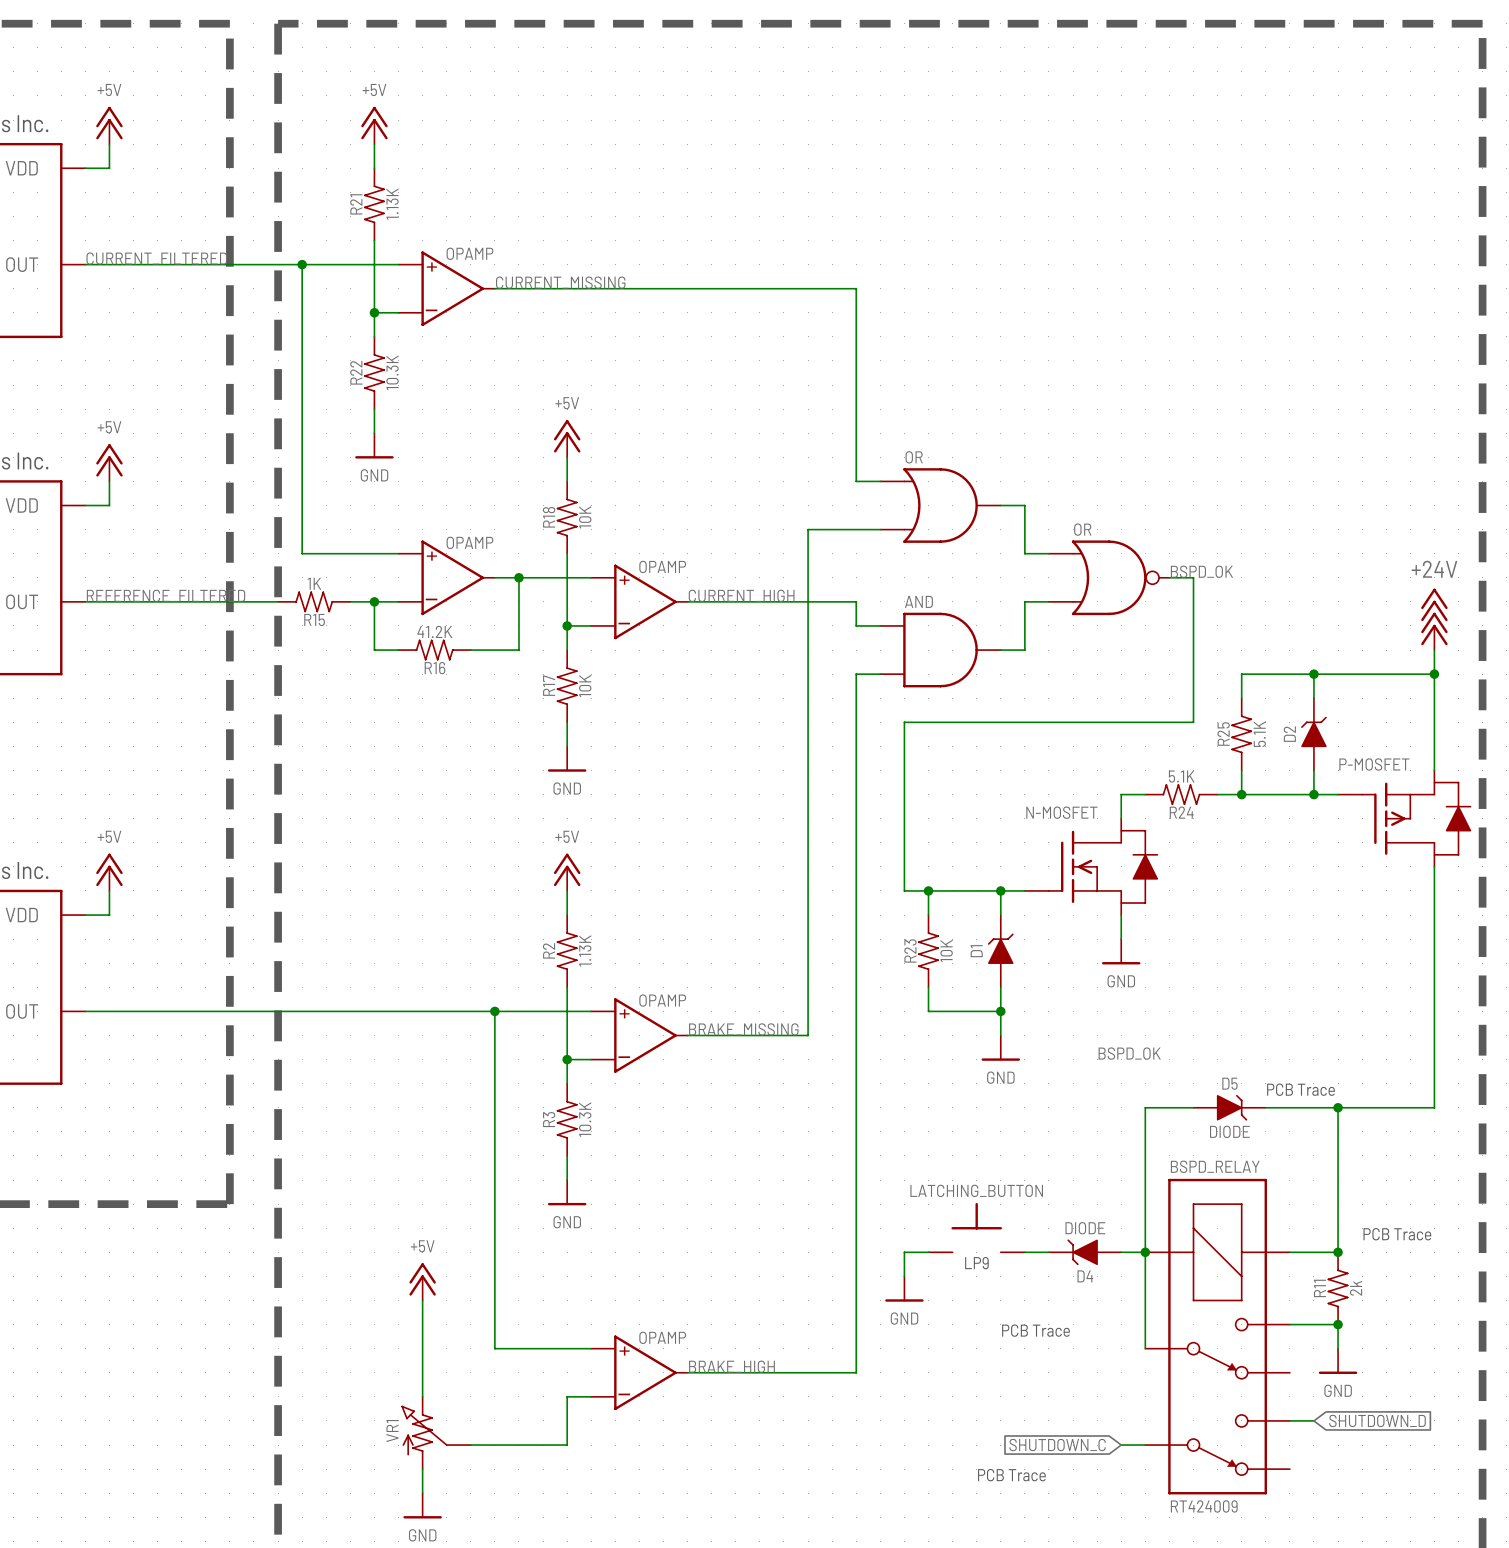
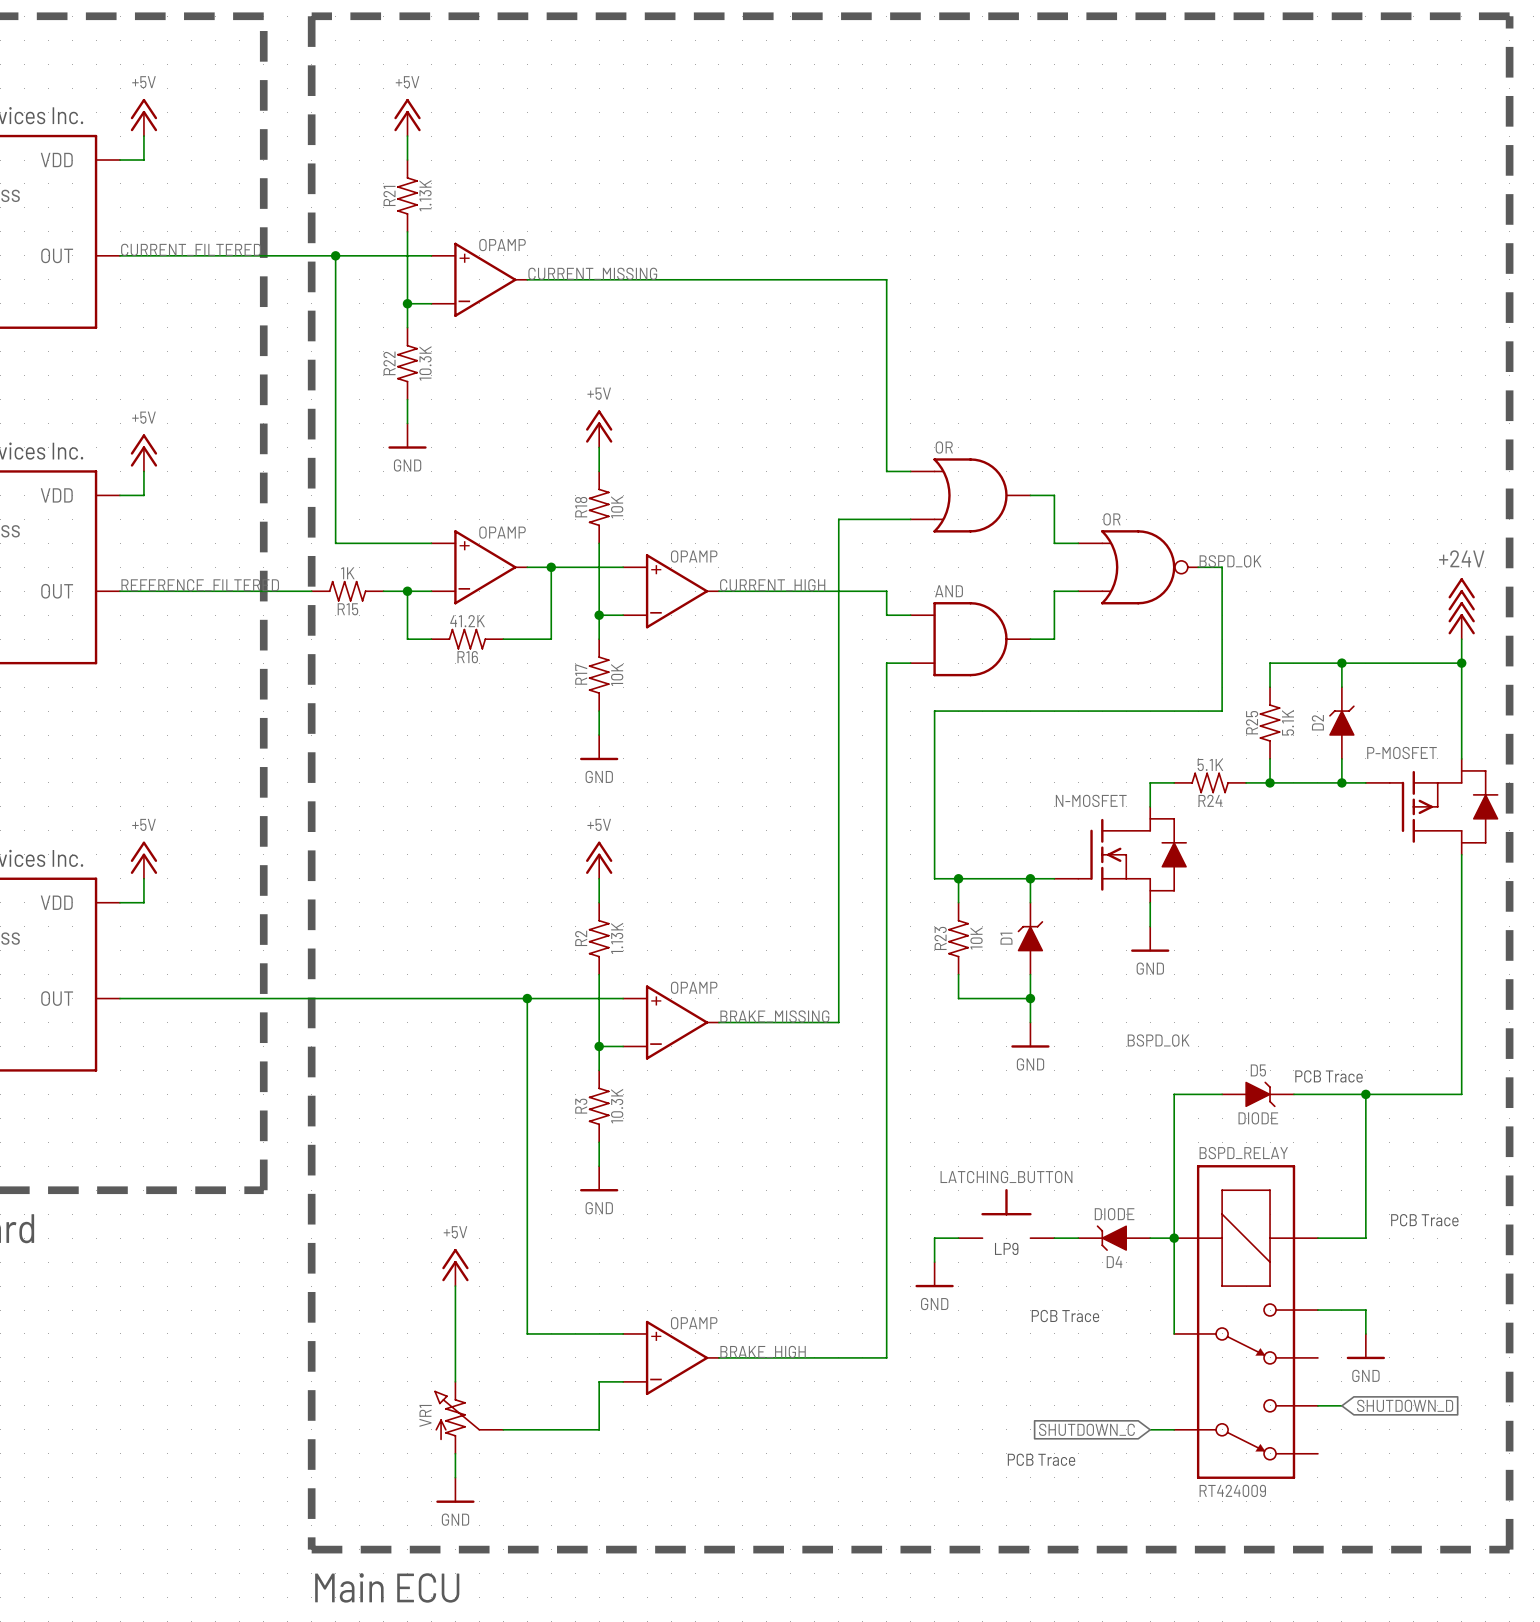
junction: (1338, 1252) -> none
R11: 2k (1338, 1288) -> none
junction: (1338, 1324) -> none

